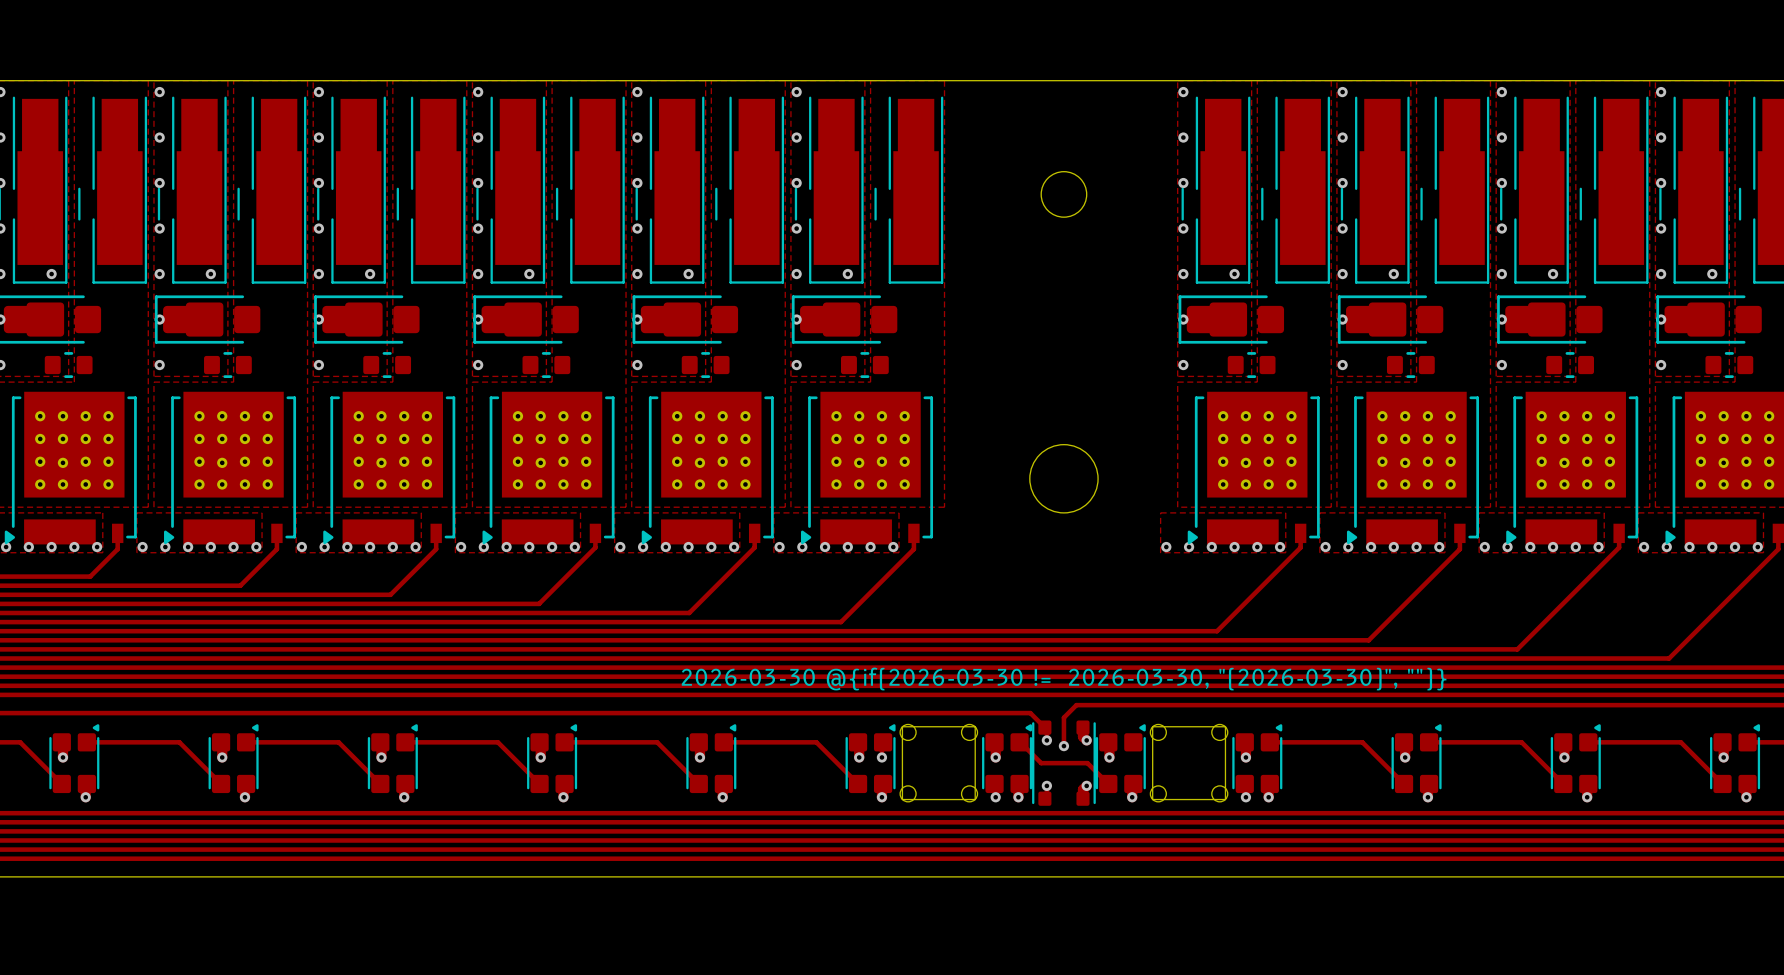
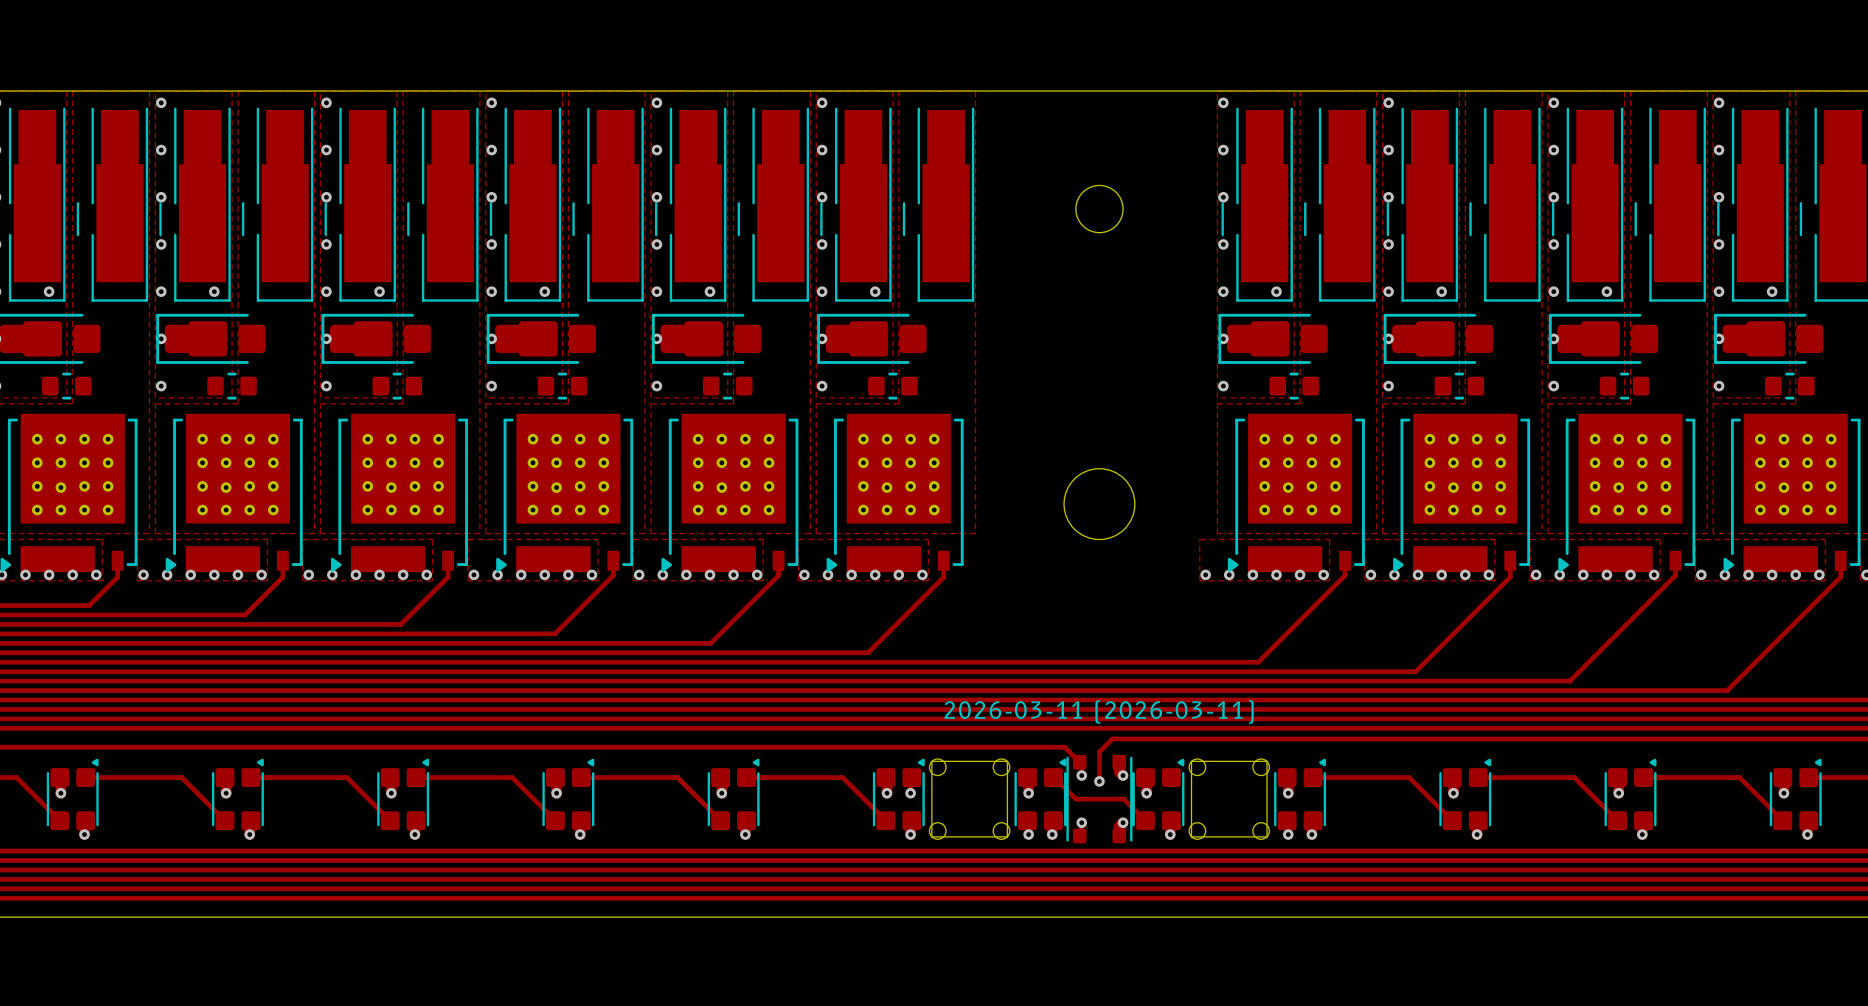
drawing shape: [681, 667, 1447, 691] -> [944, 700, 1254, 724]

